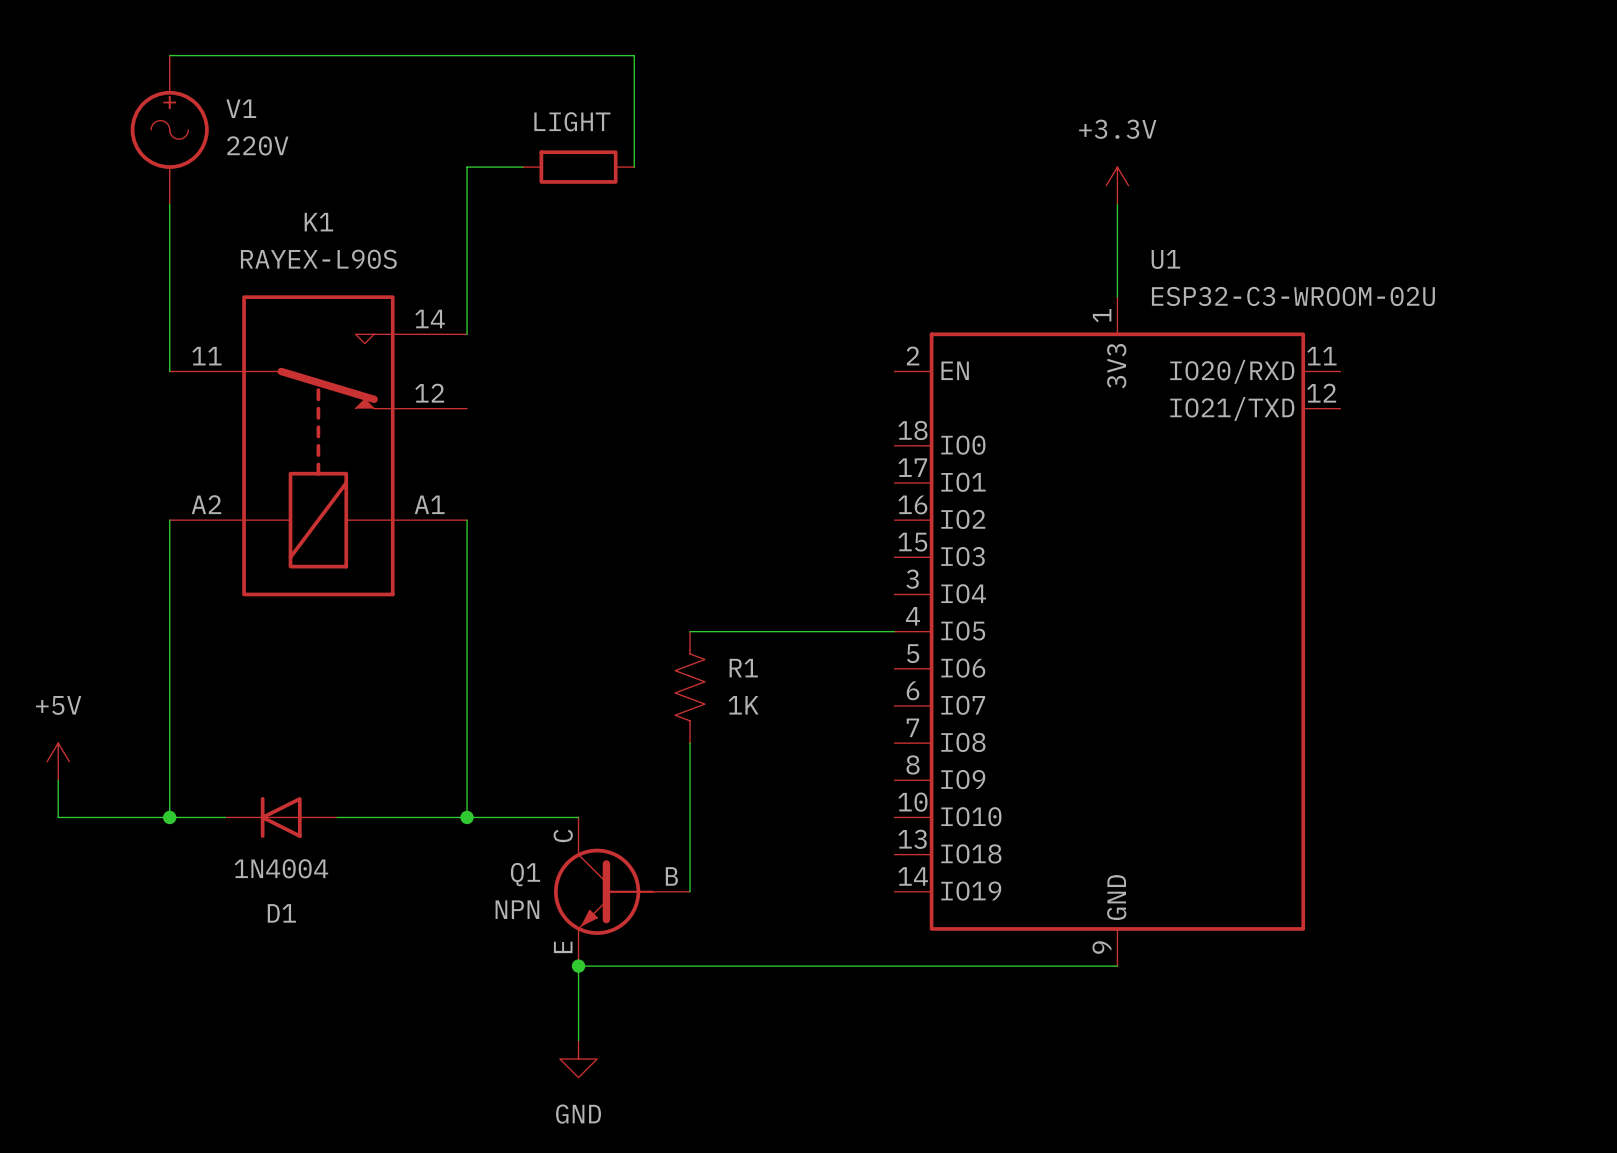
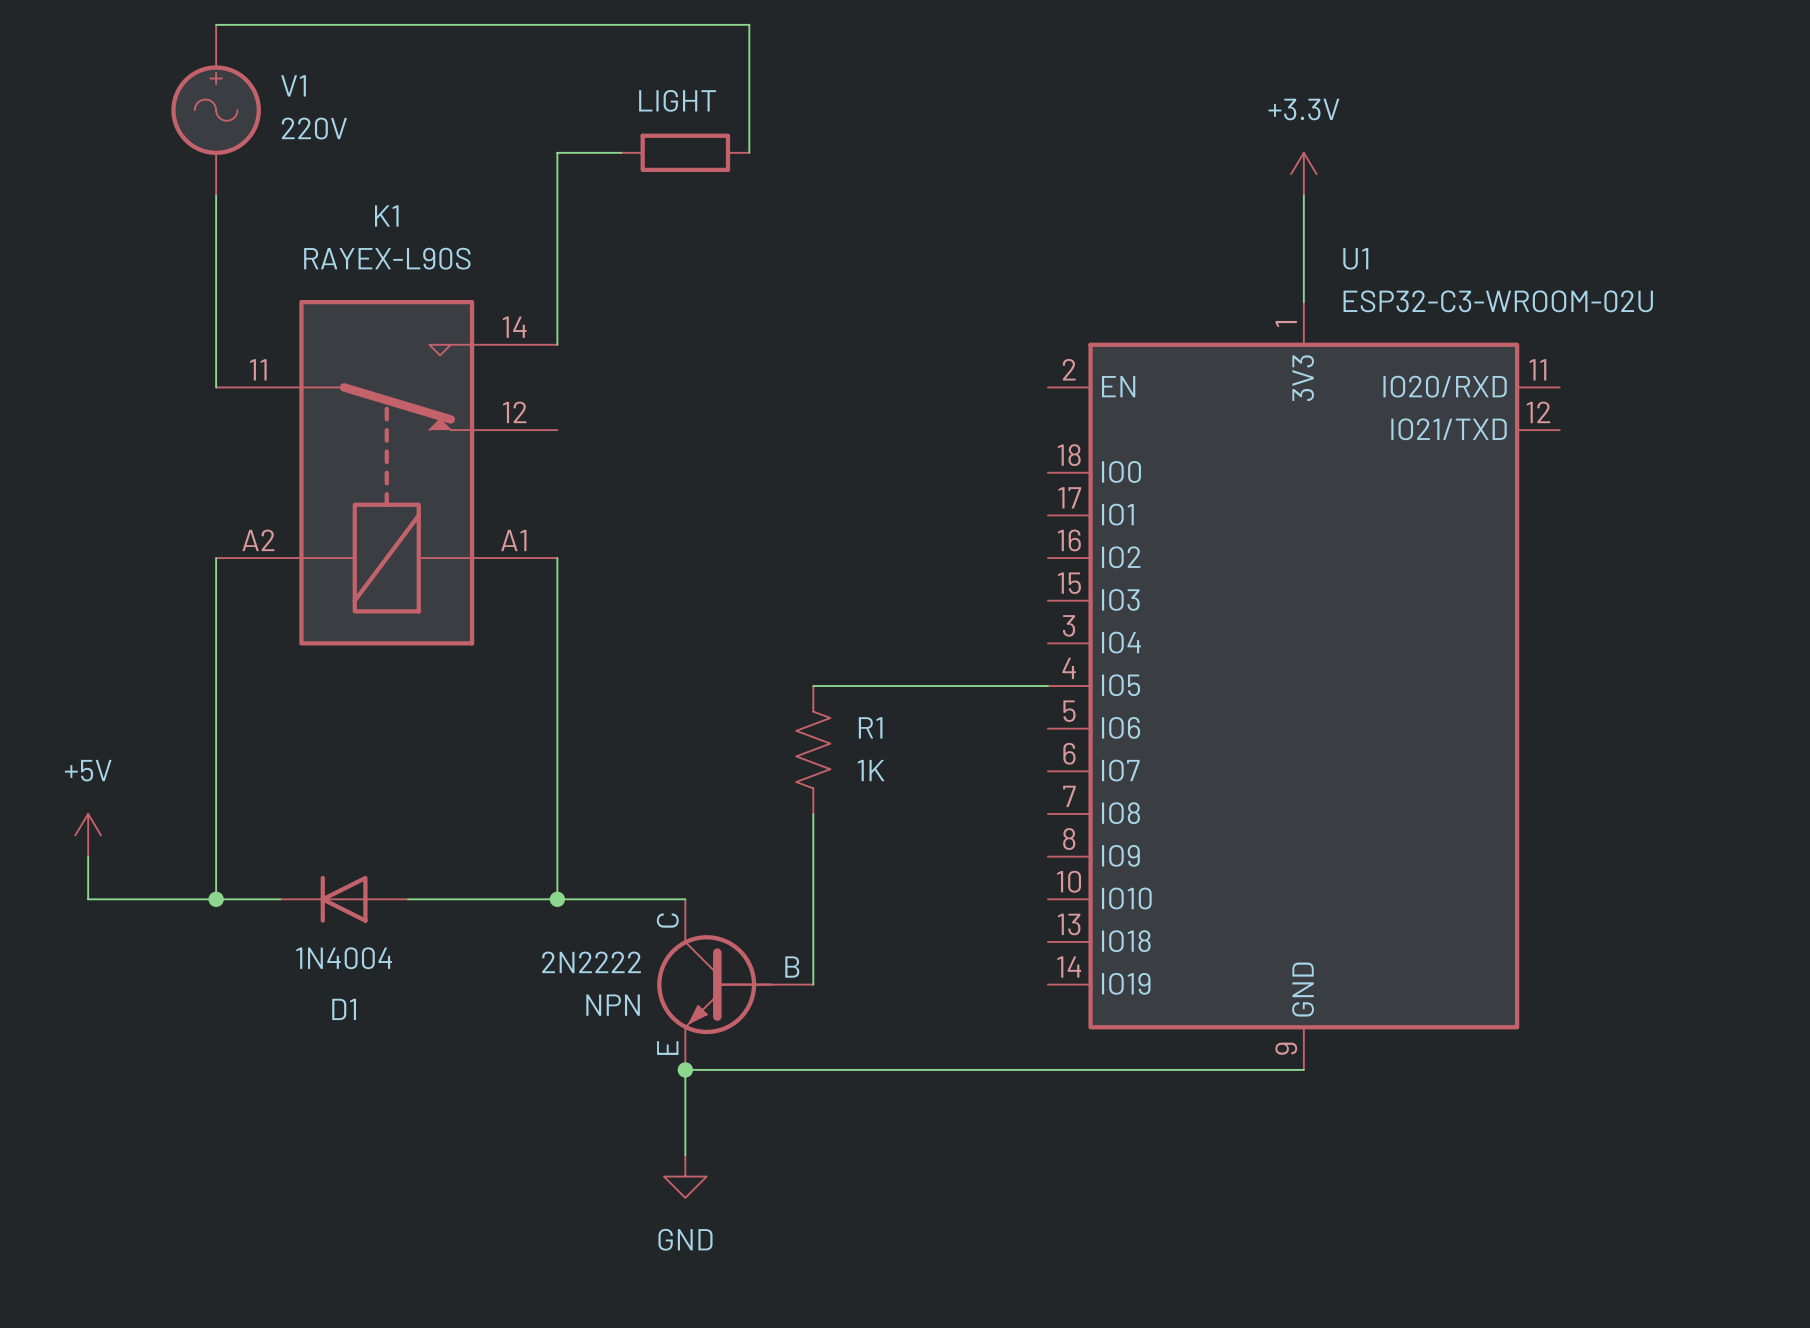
Q1 name: Q1 (525, 874) -> 2N2222 (591, 962)

